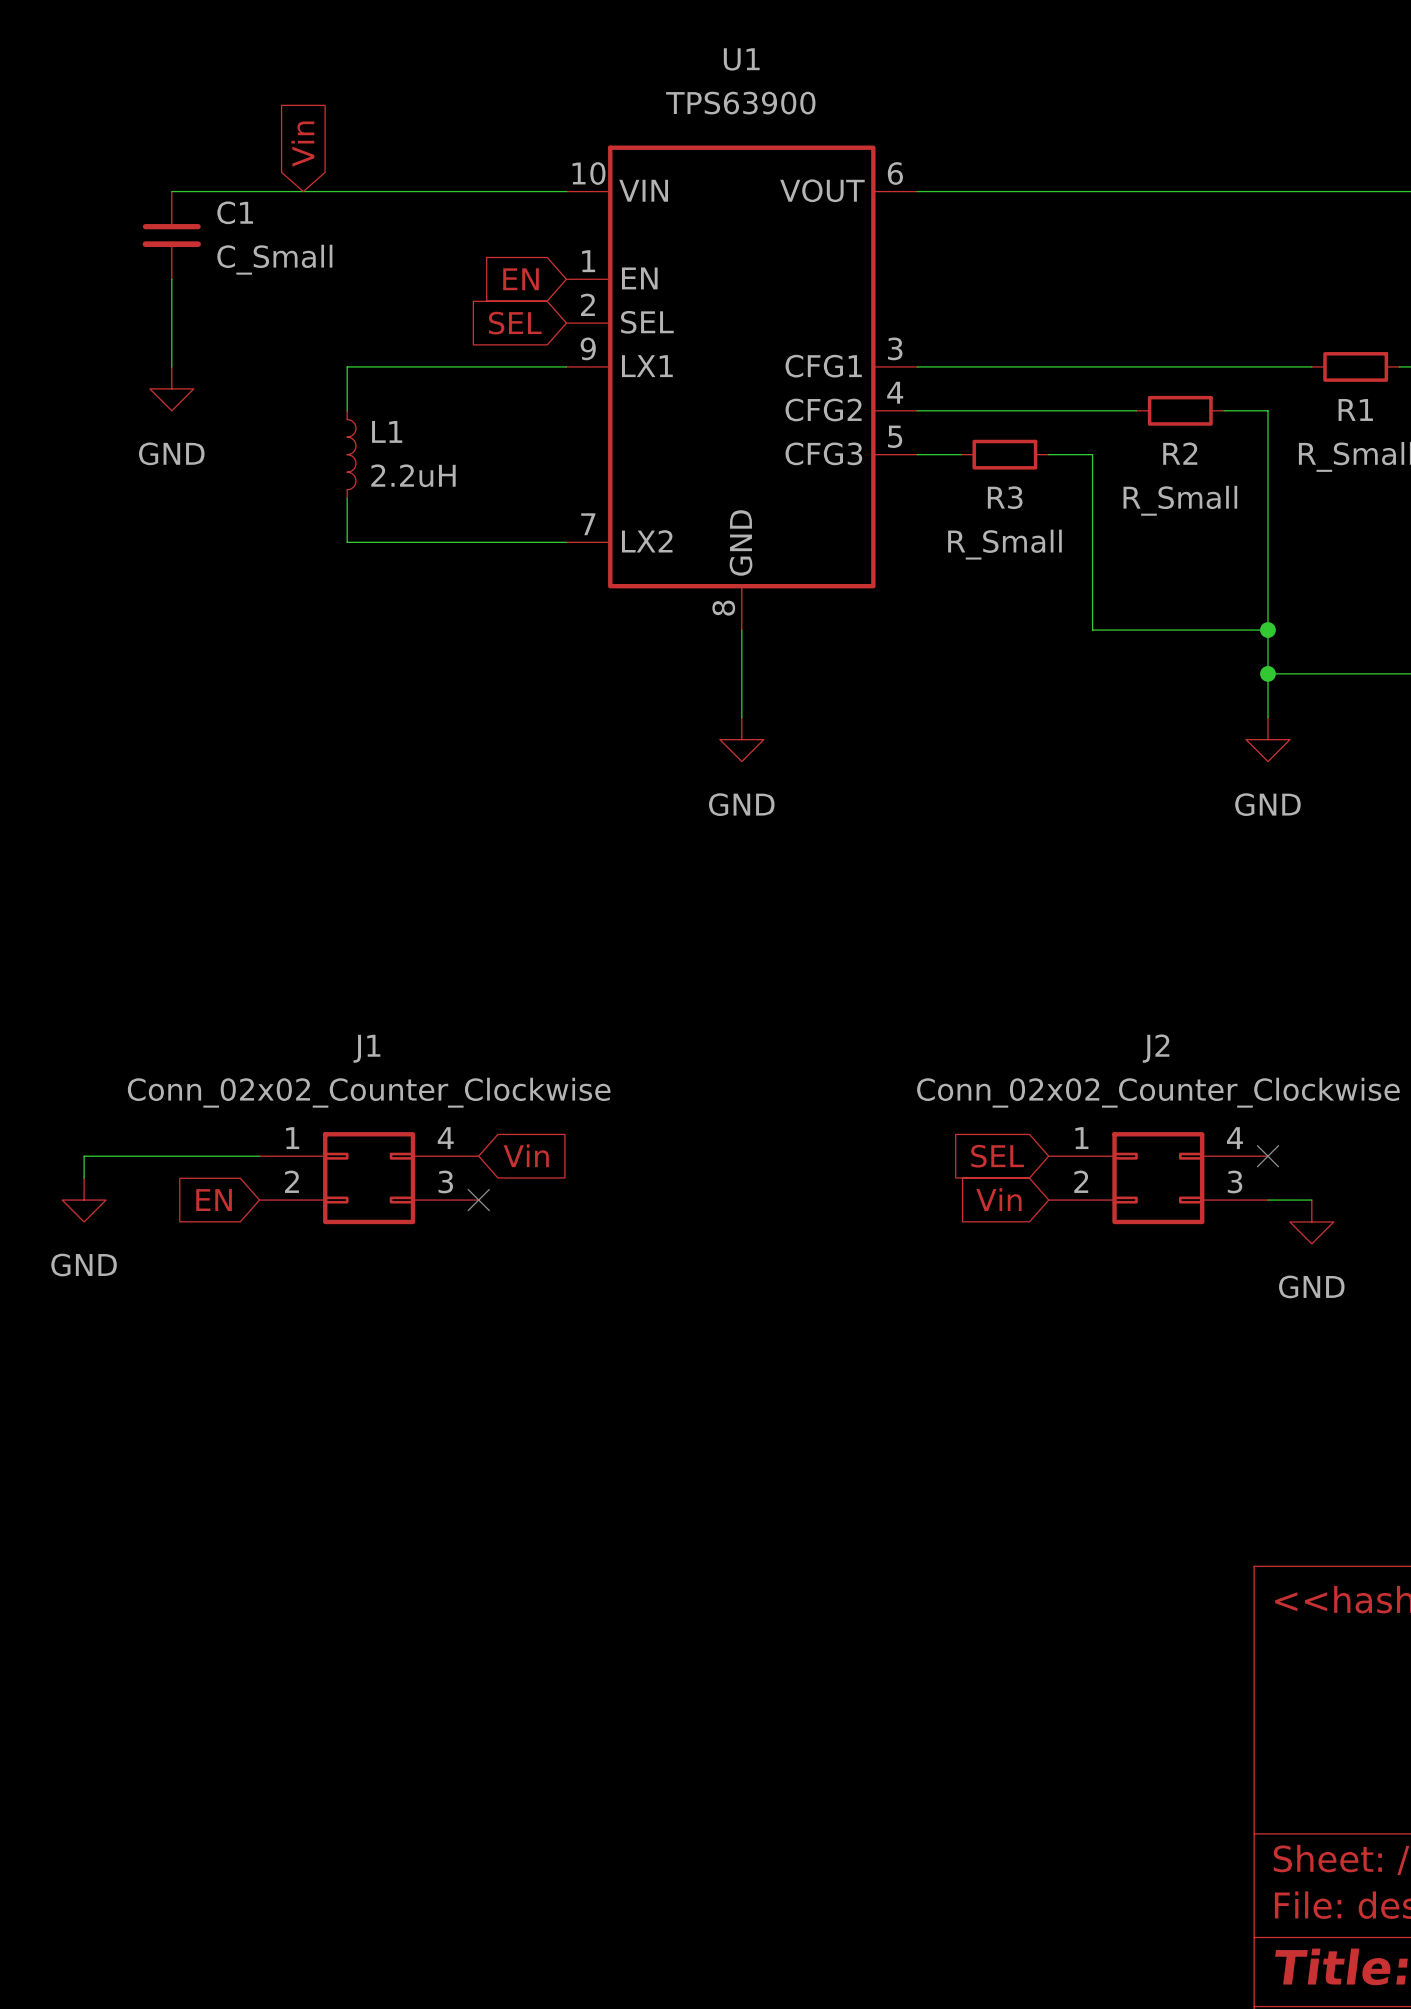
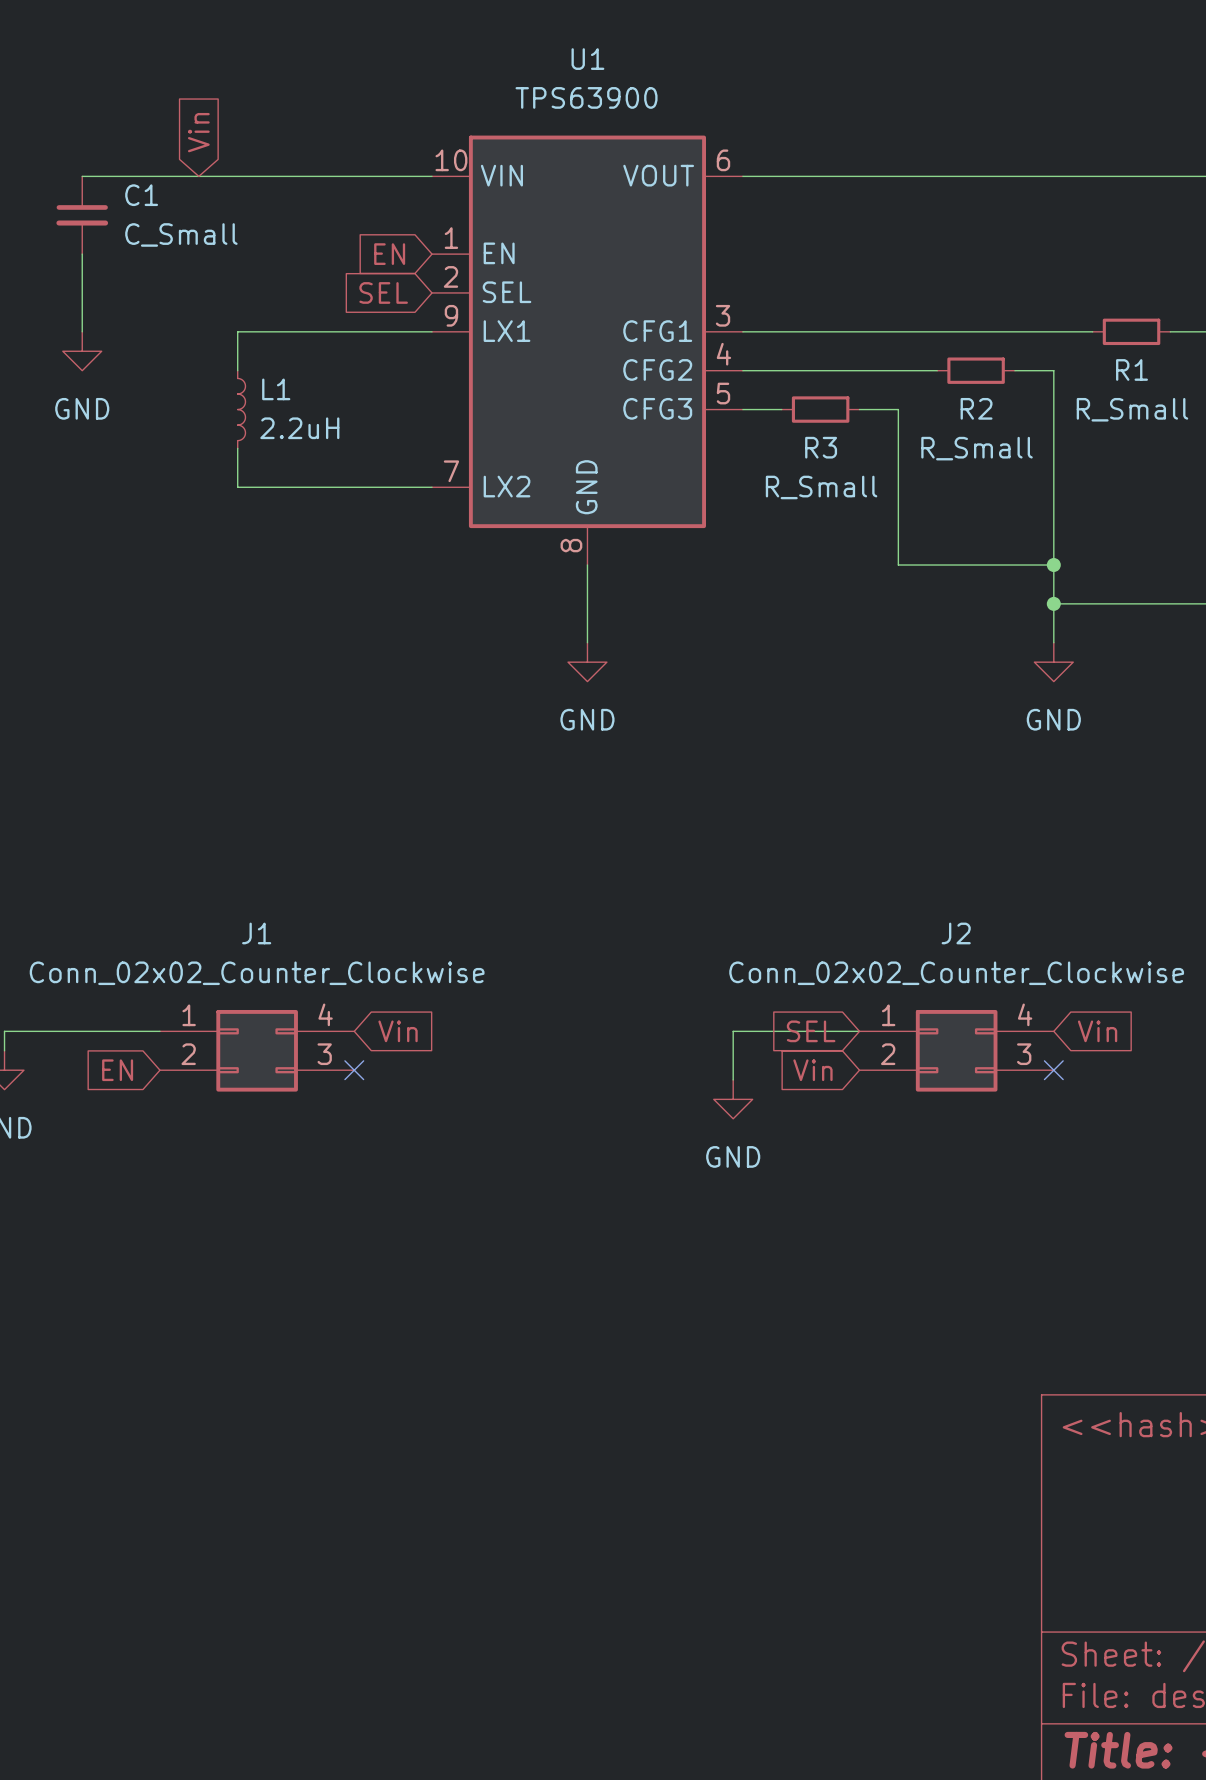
global label: none -> Vin (1097, 1031)
wire: none -> (859, 1031) (733, 1031) (733, 1079)
no-connect mark position: (1267, 1156) -> (1053, 1070)
wire: (1267, 1200) (1311, 1200) -> none
power symbol position: GND (1311, 1221) -> GND (733, 1099)

